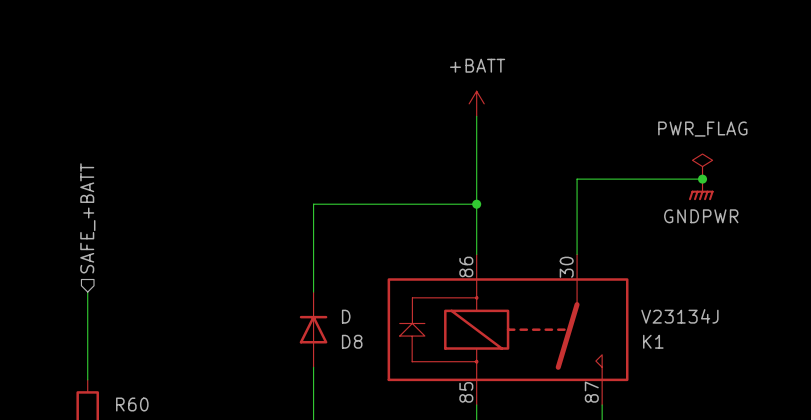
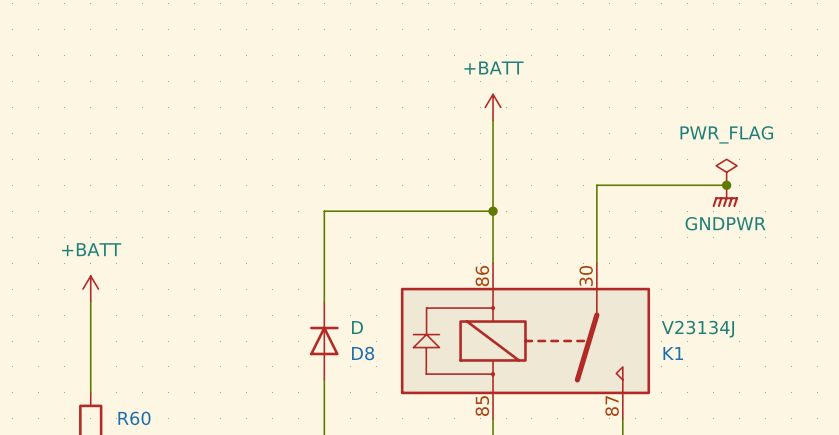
hierarchical label: SAFE_+BATT (87, 218) -> none
power symbol: none -> +BATT (90, 289)

